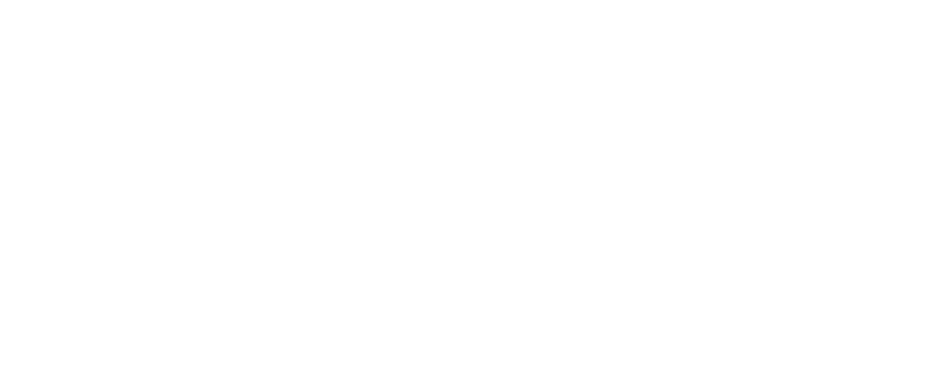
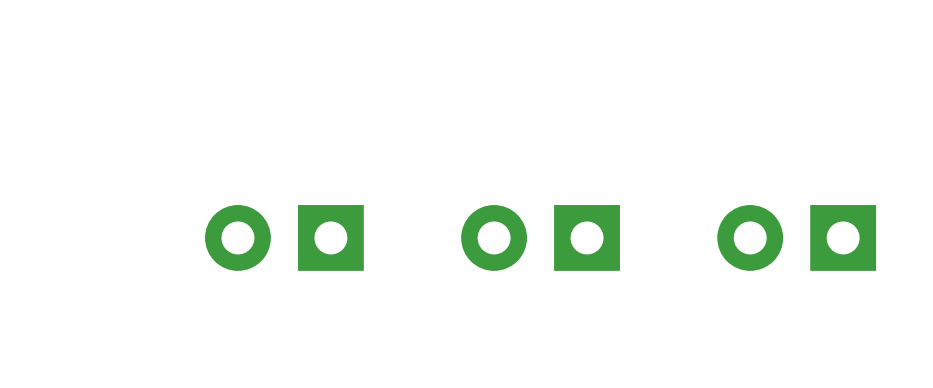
part: none -> (284, 237)
part: none -> (540, 237)
part: none -> (796, 237)

